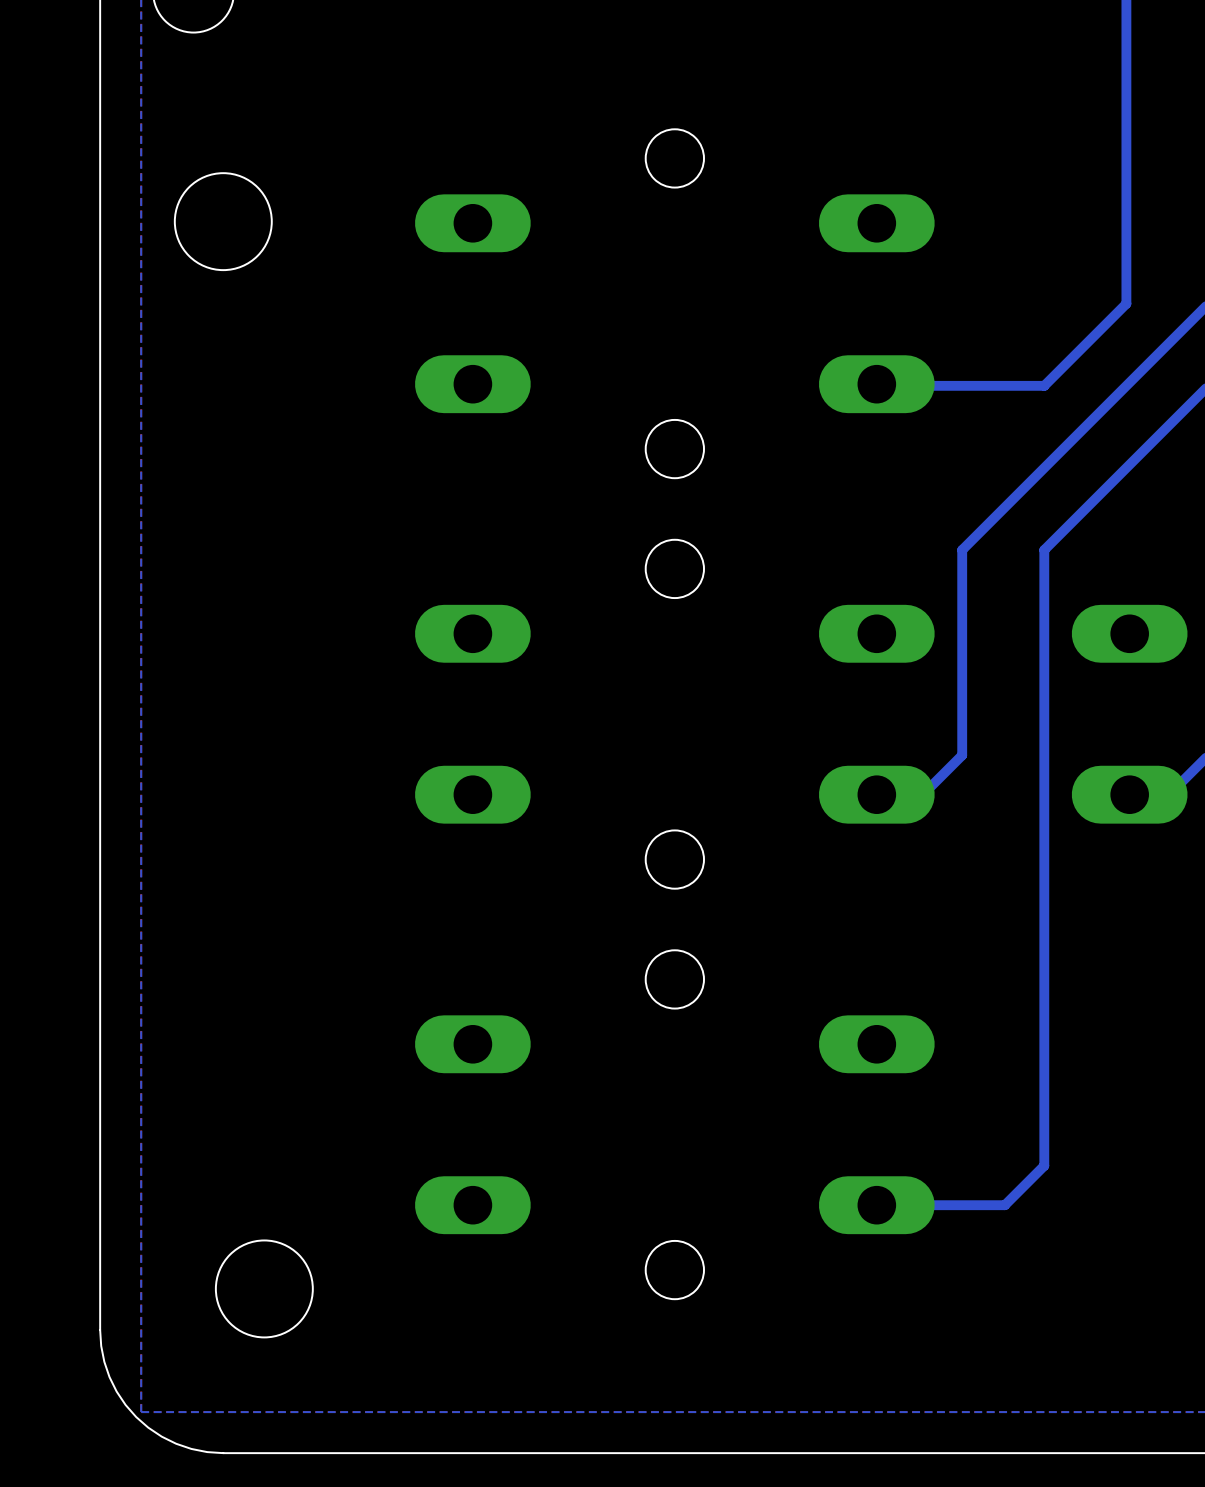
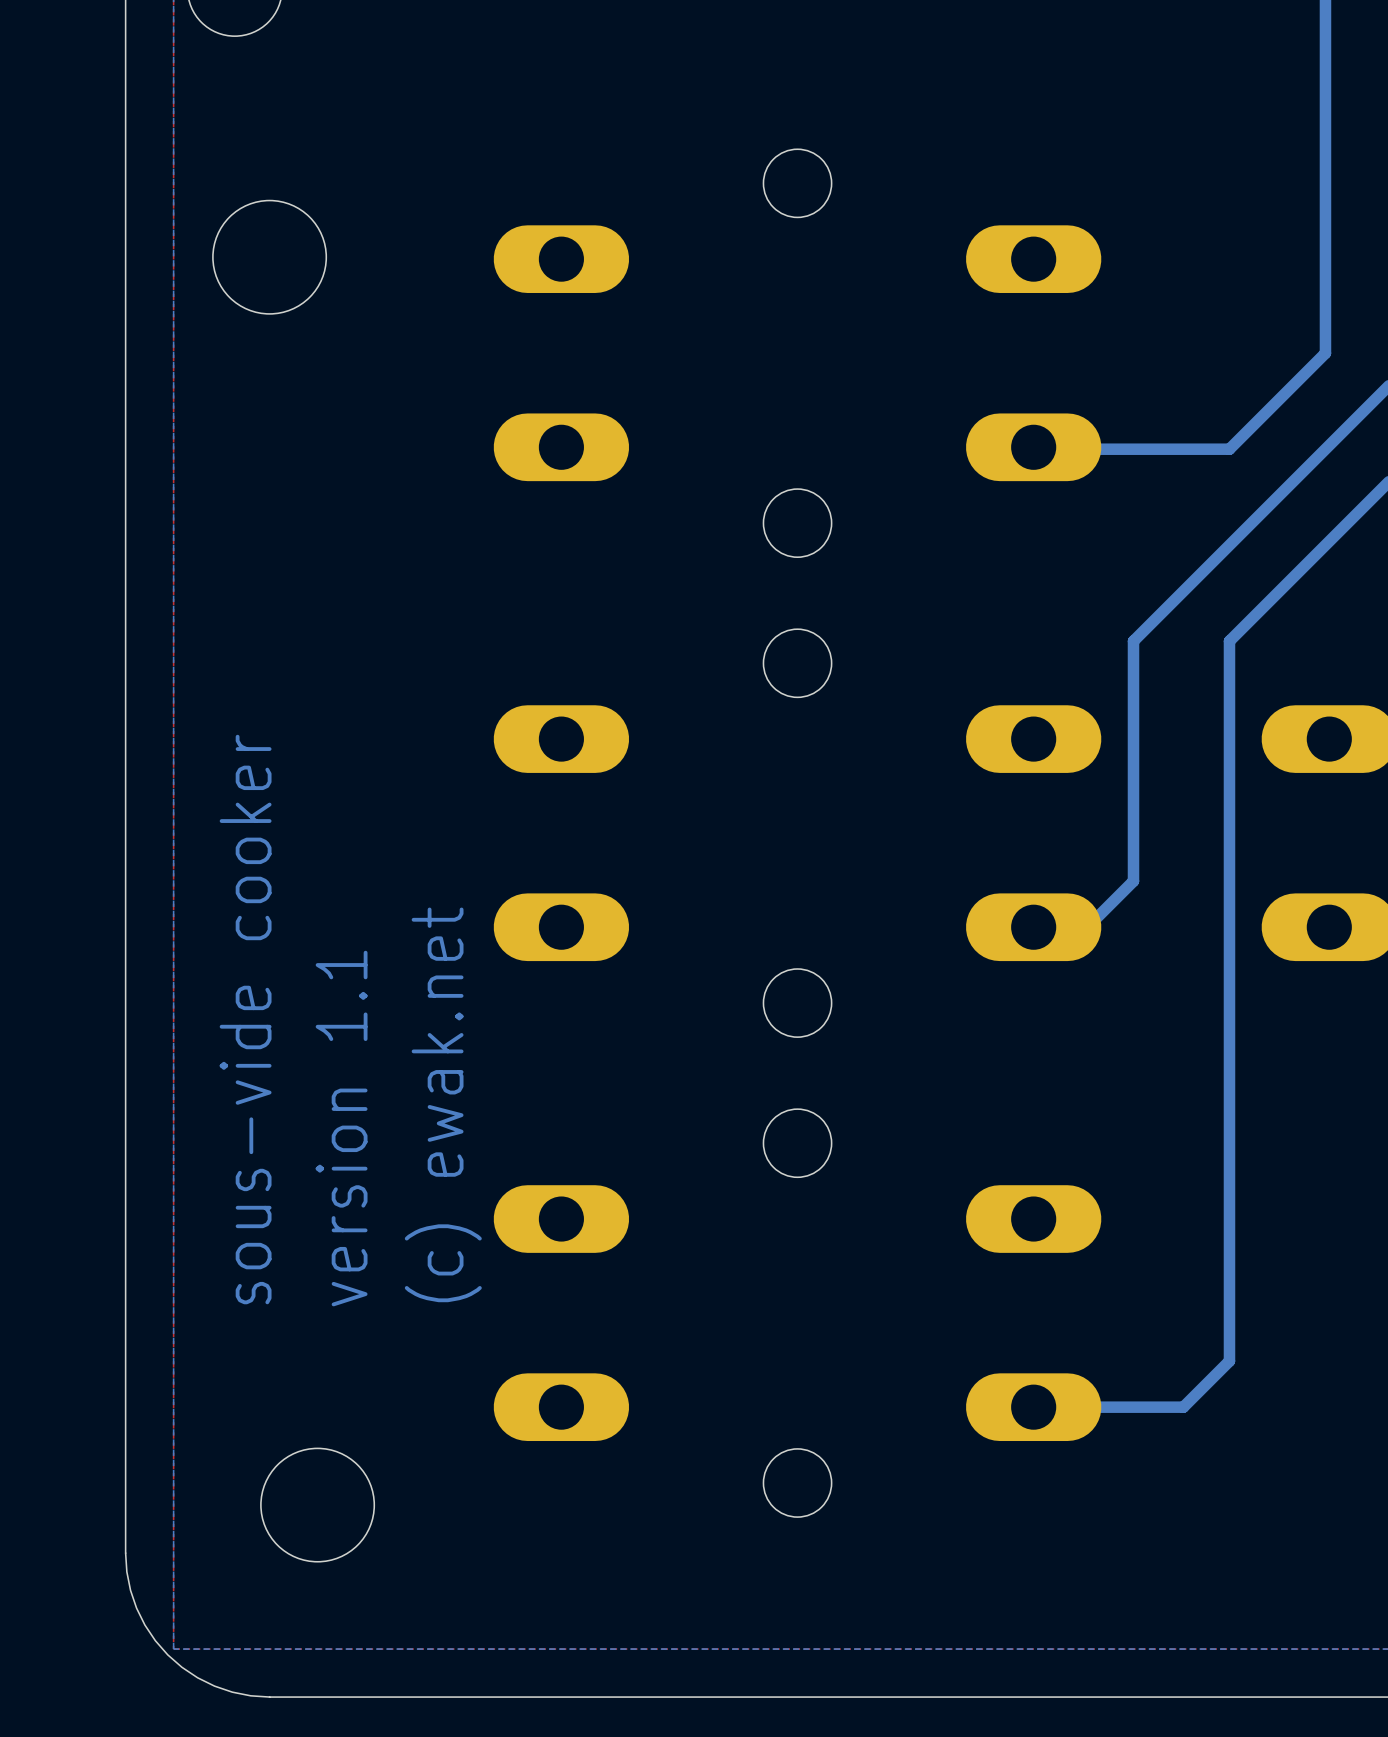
text: none -> sous-vide cooker (245, 1019)
text: none -> (c) ewak.net (443, 1104)
text: none -> version 1.1 (341, 1128)

